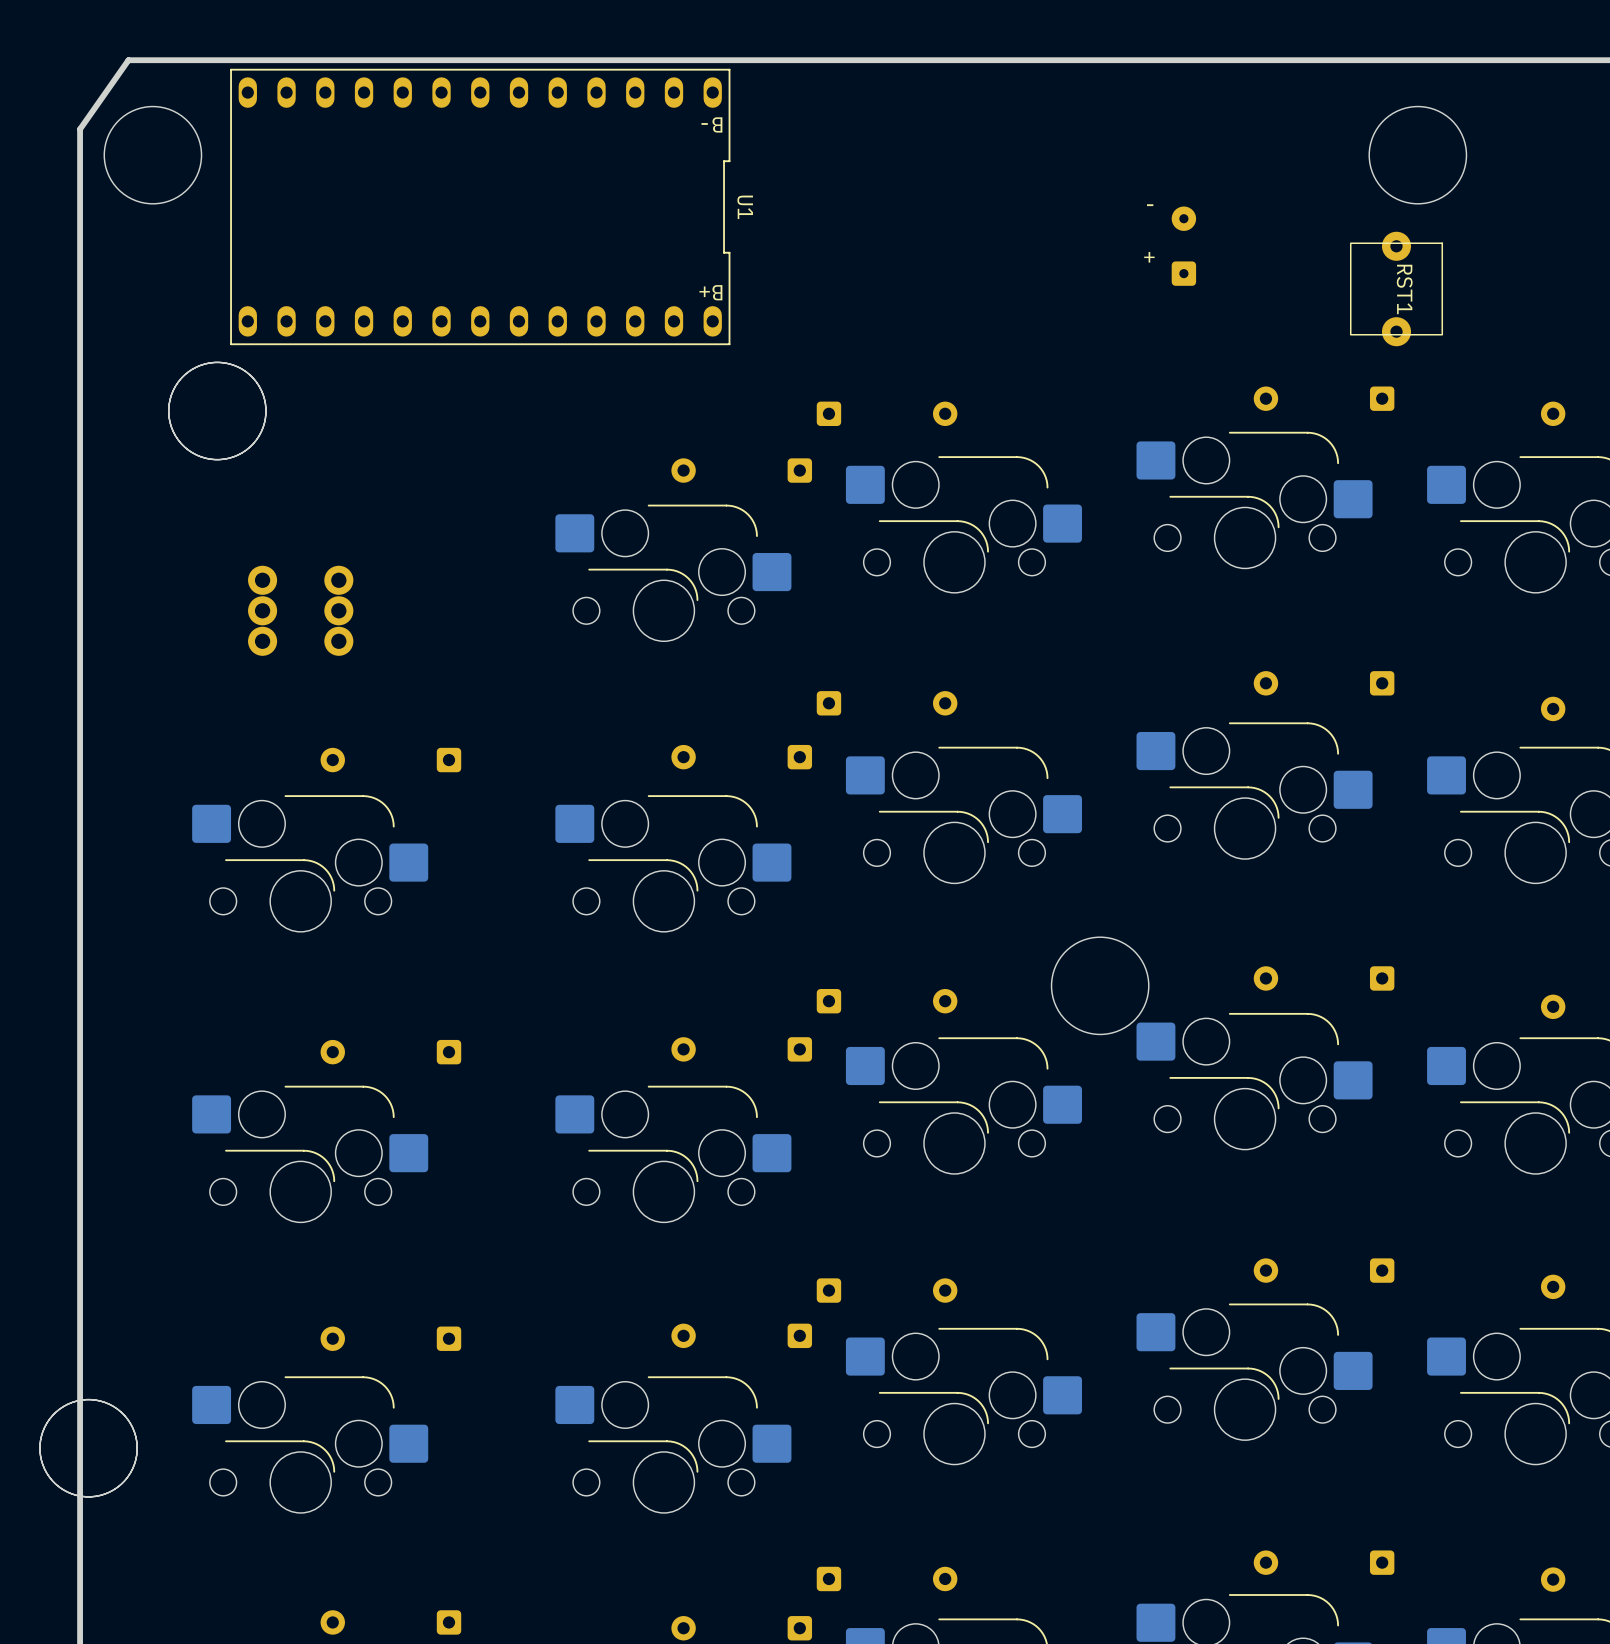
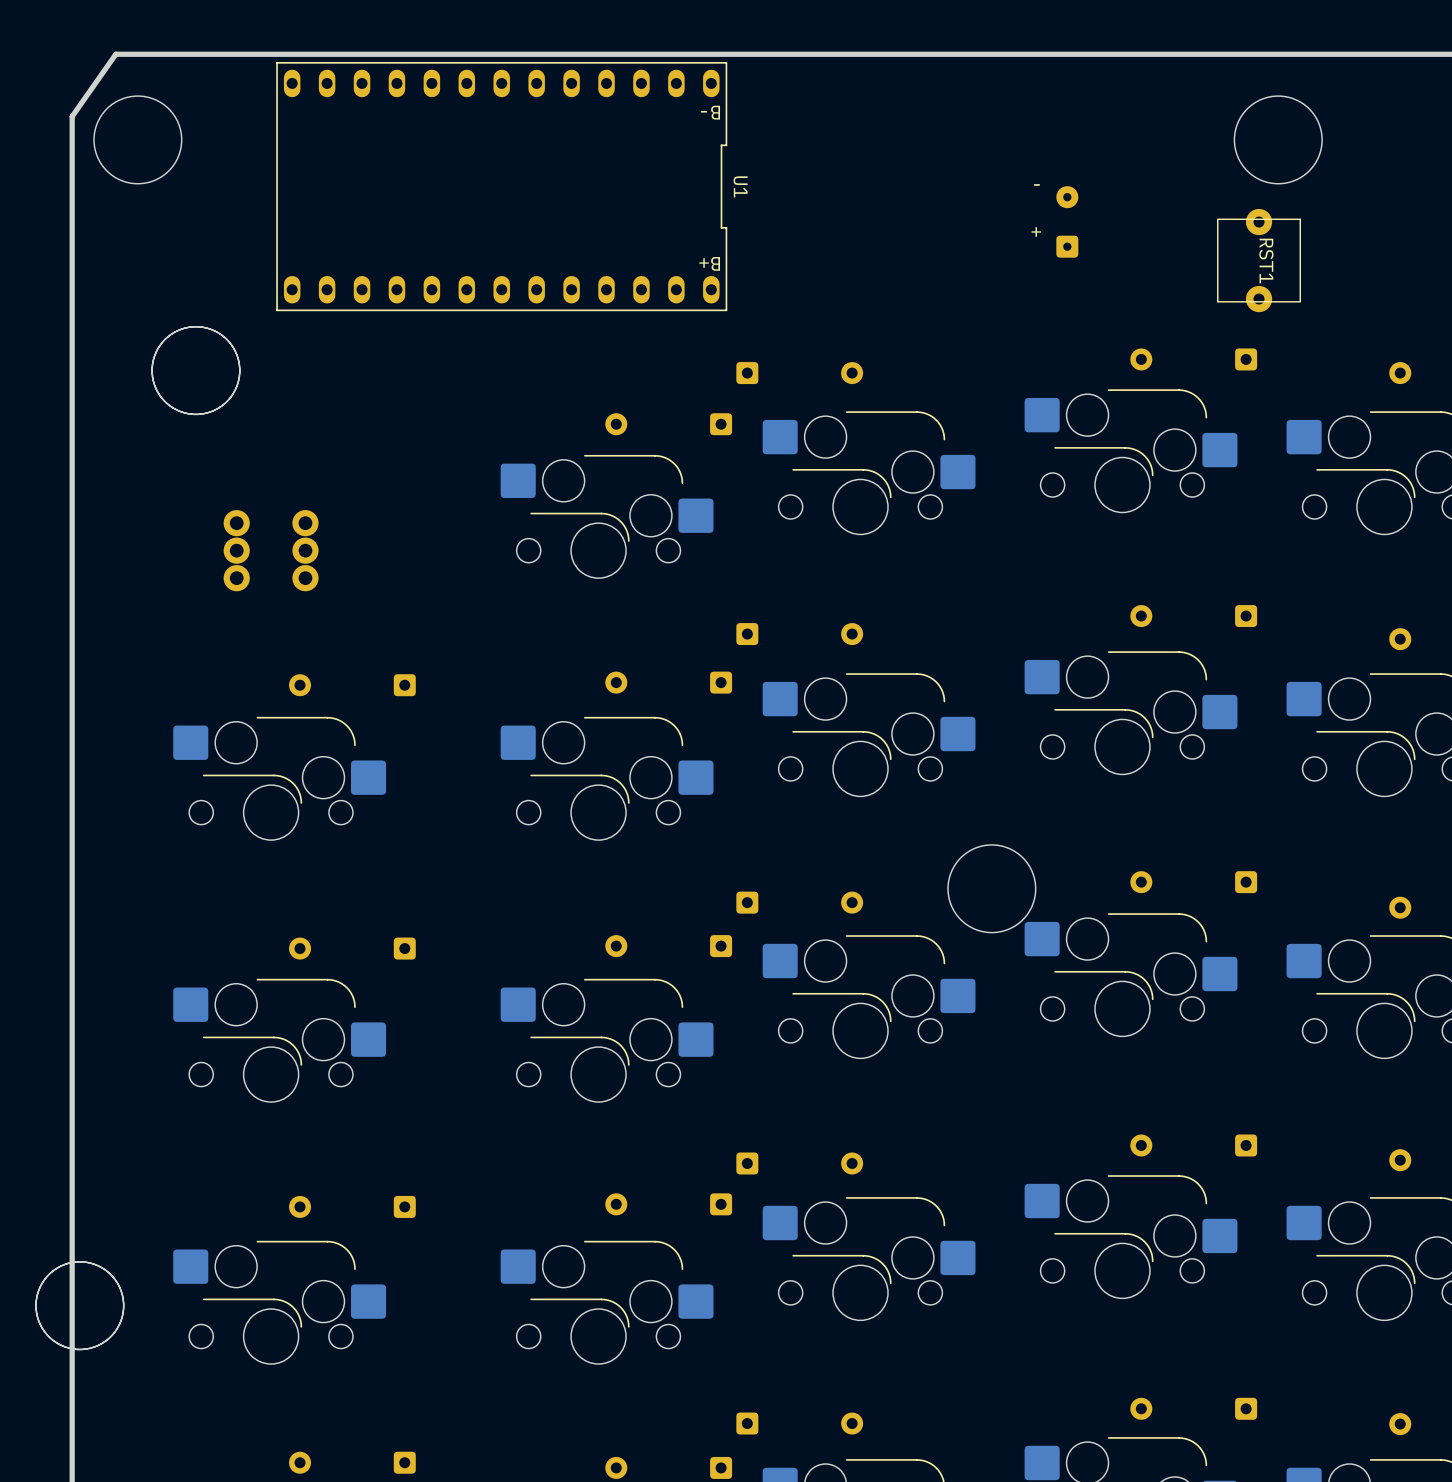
U1 position: (480, 206) -> (501, 186)

